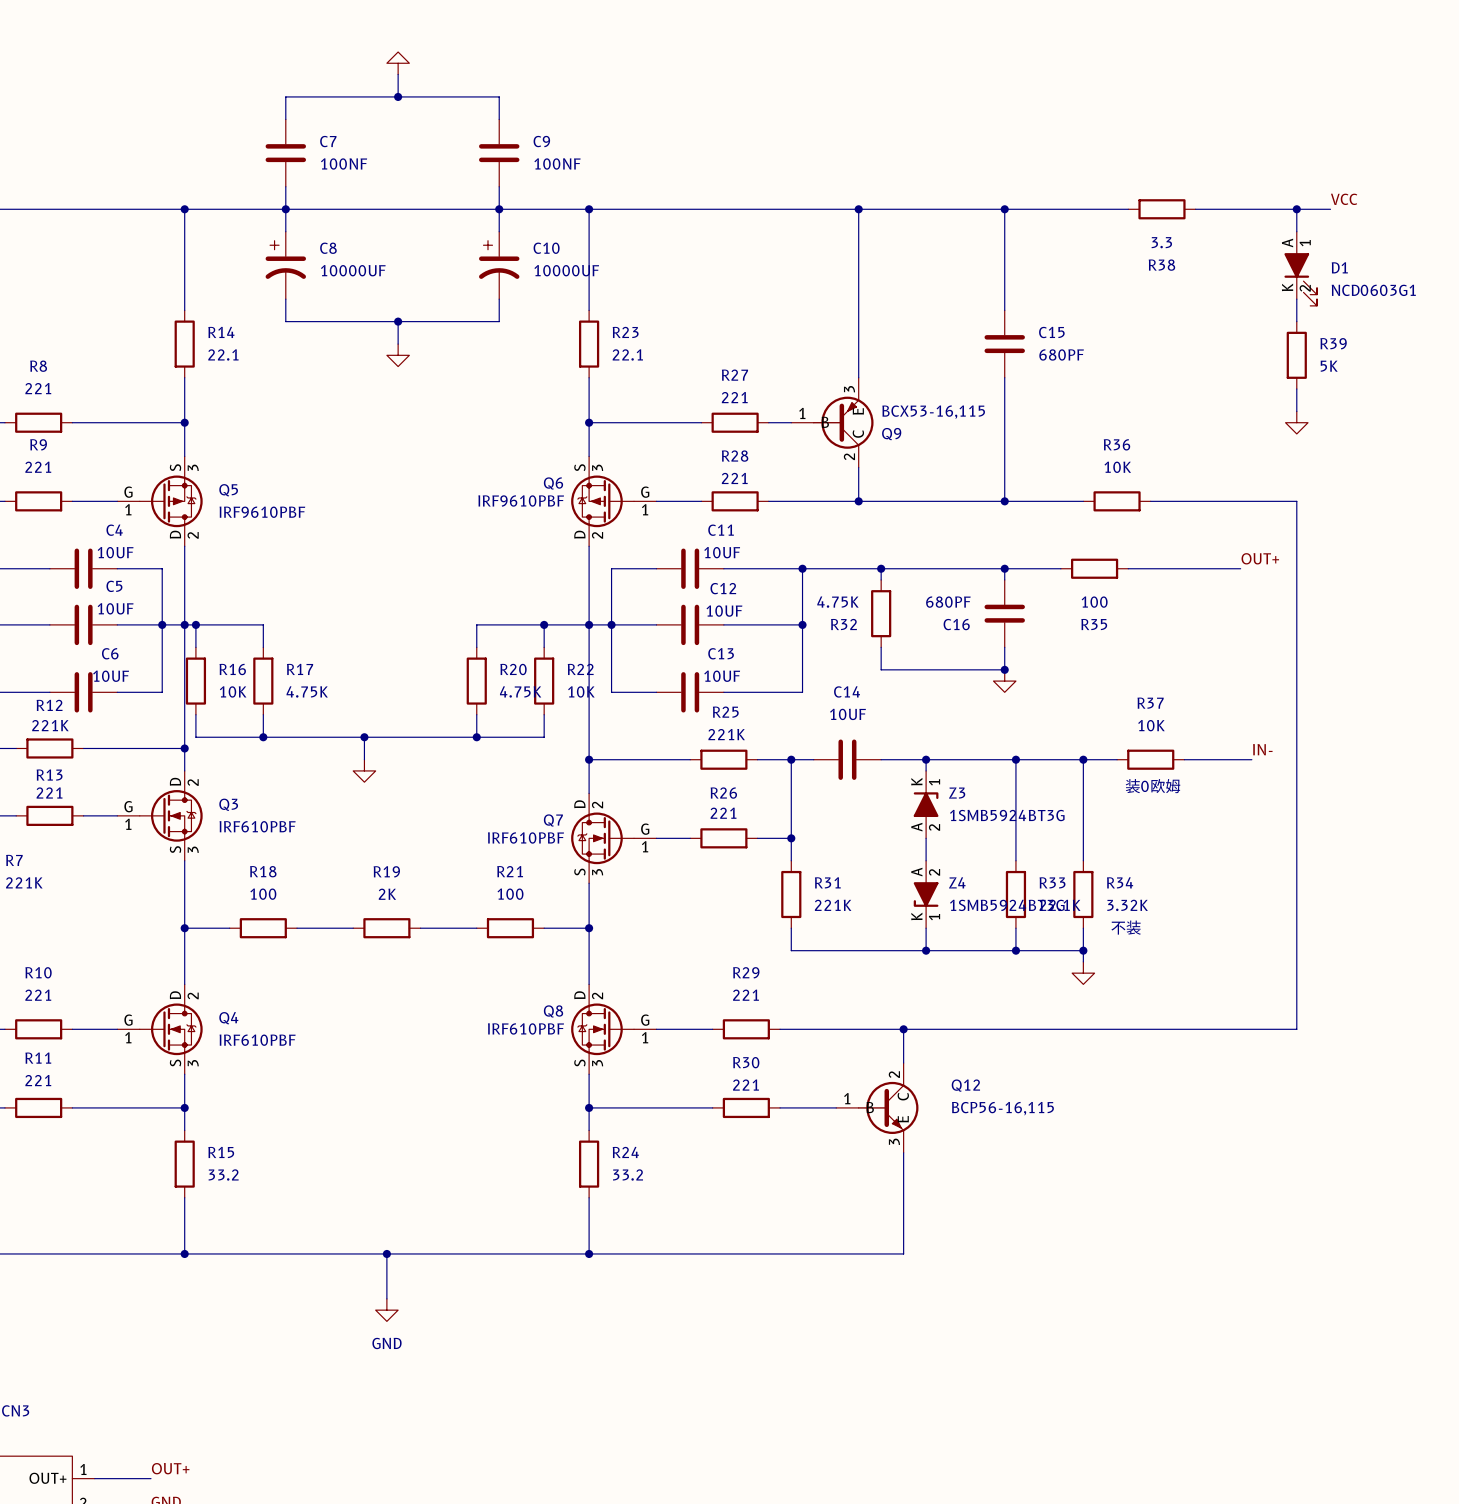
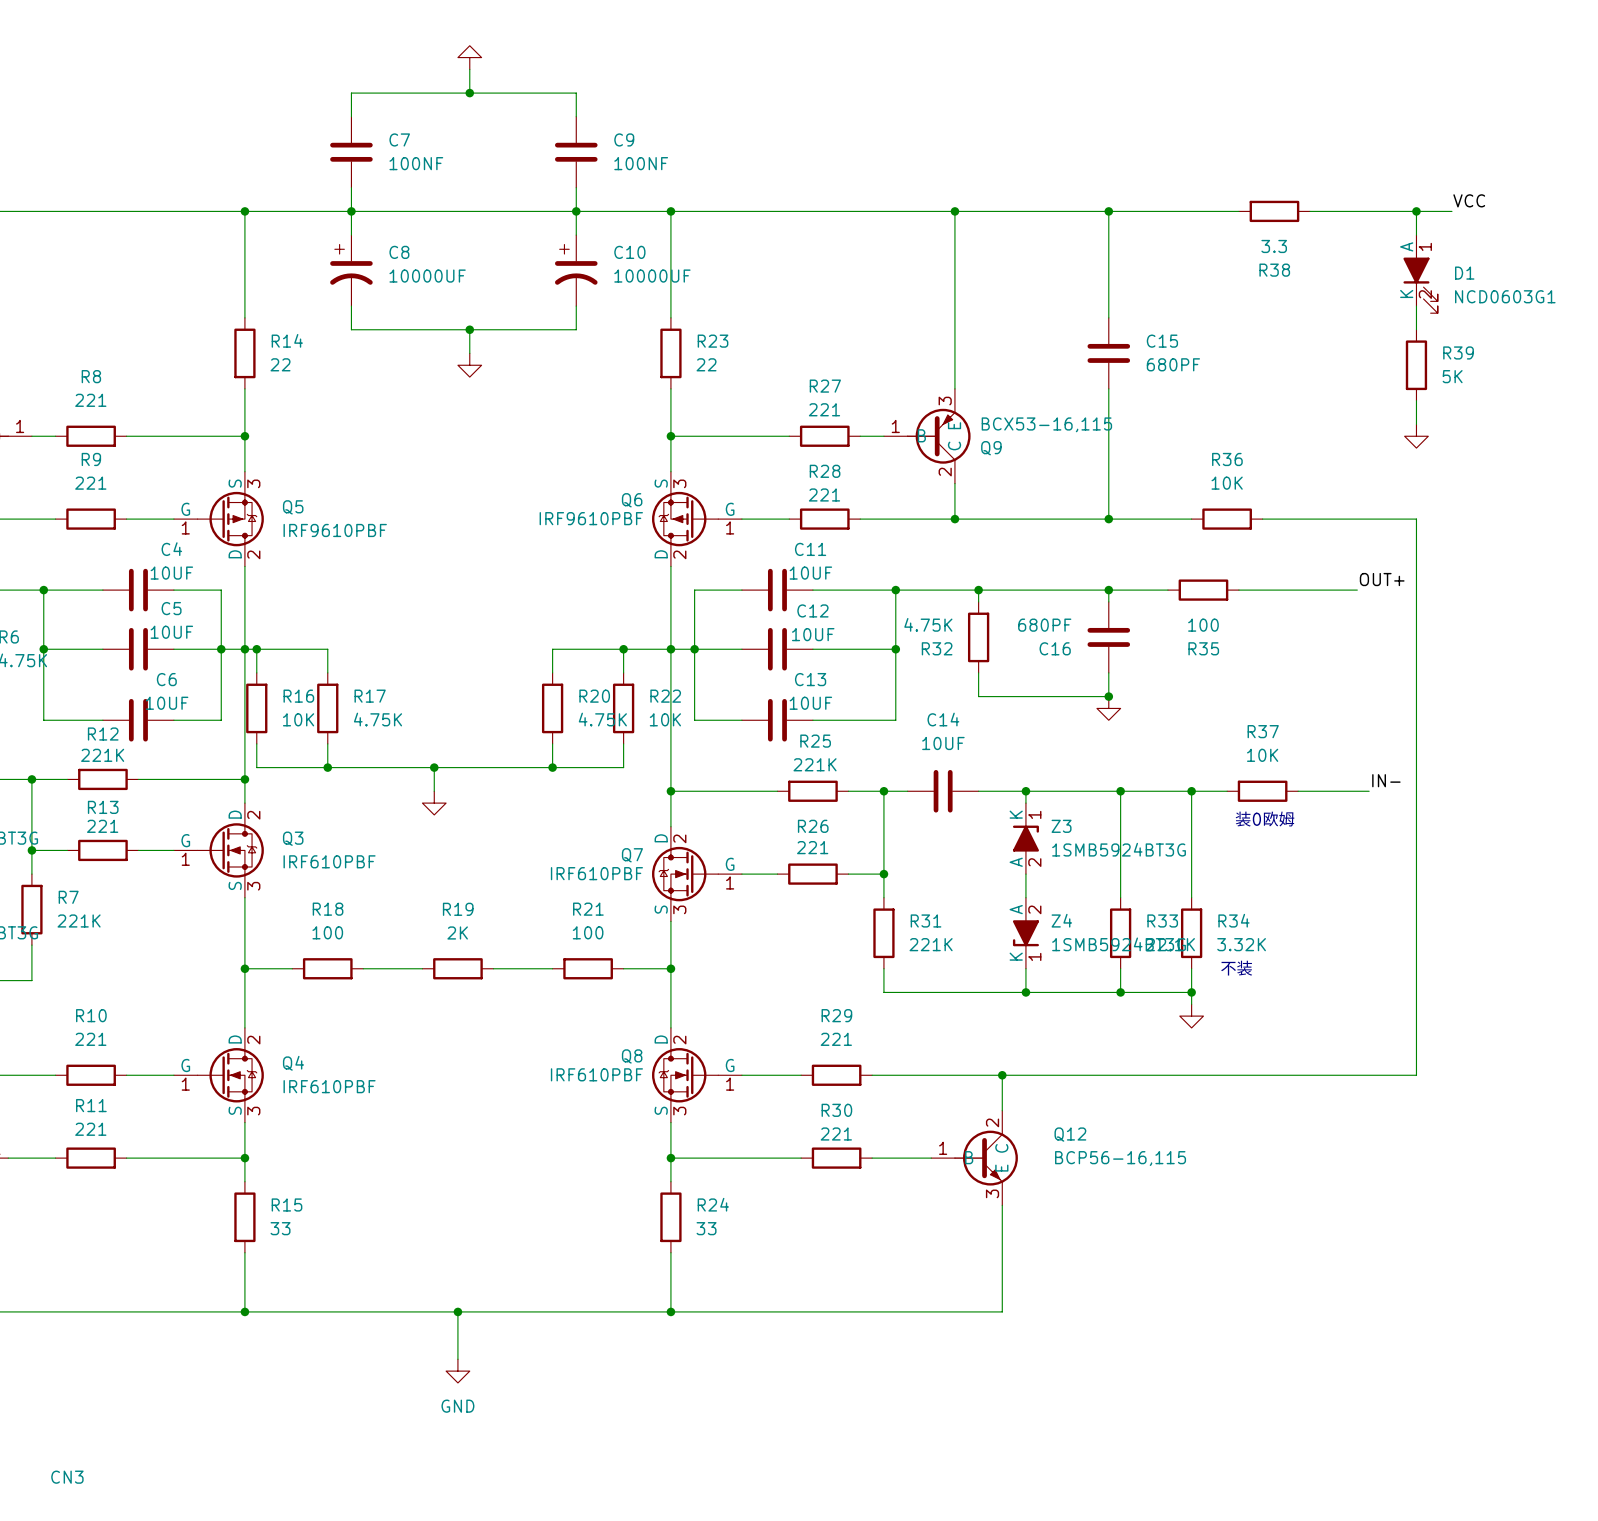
R14 value: 22.1 (223, 354) -> 22 (280, 364)
R23 value: 22.1 (627, 354) -> 22 (706, 364)
R15 value: 33.2 (223, 1175) -> 33 (280, 1228)
R24 value: 33.2 (628, 1175) -> 33 (706, 1228)

